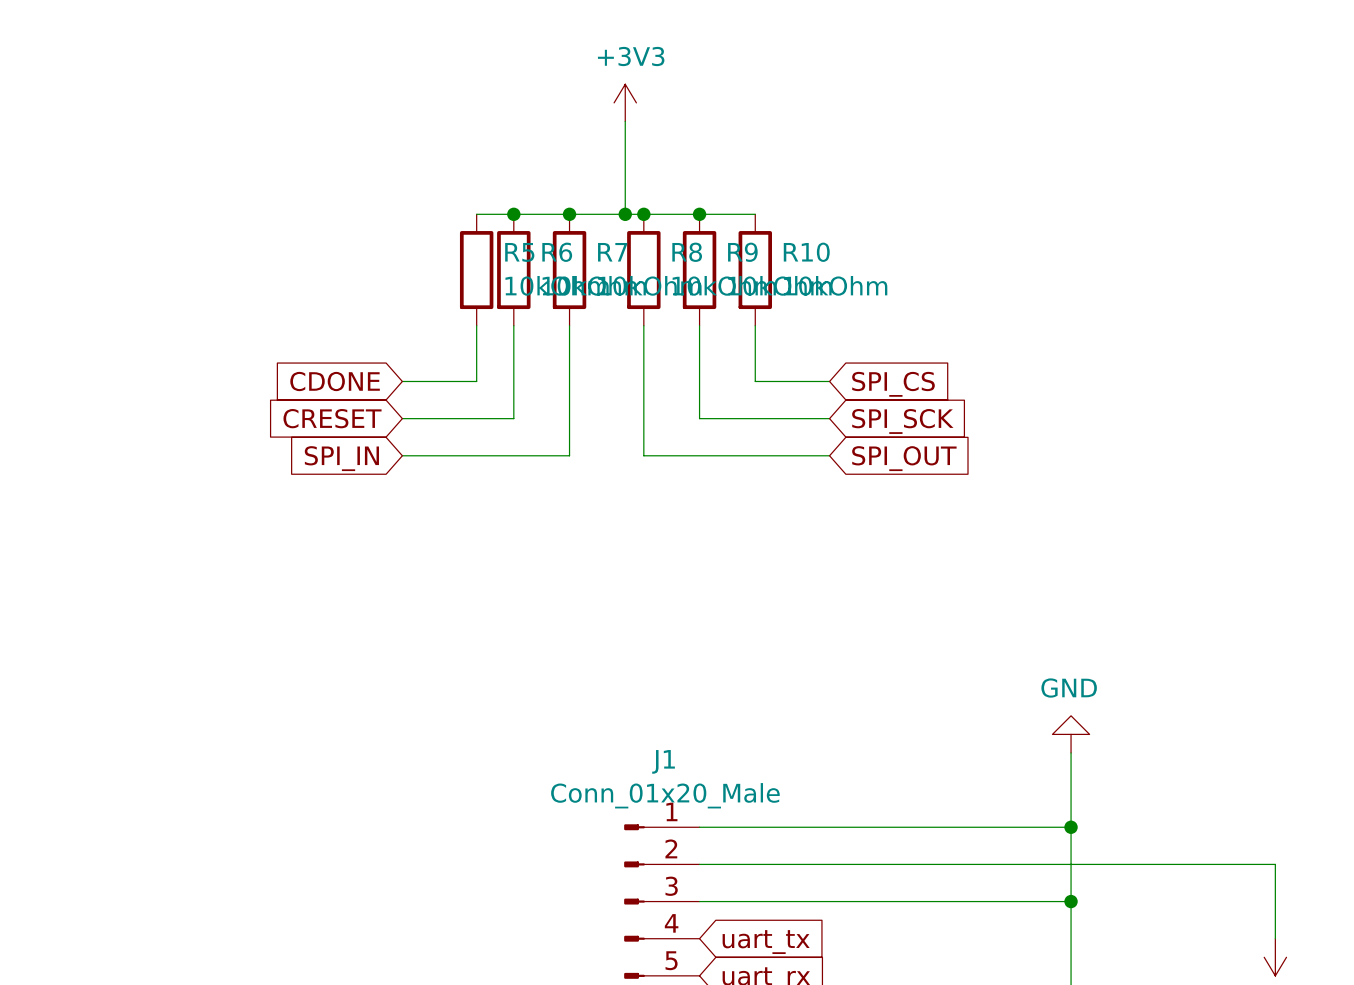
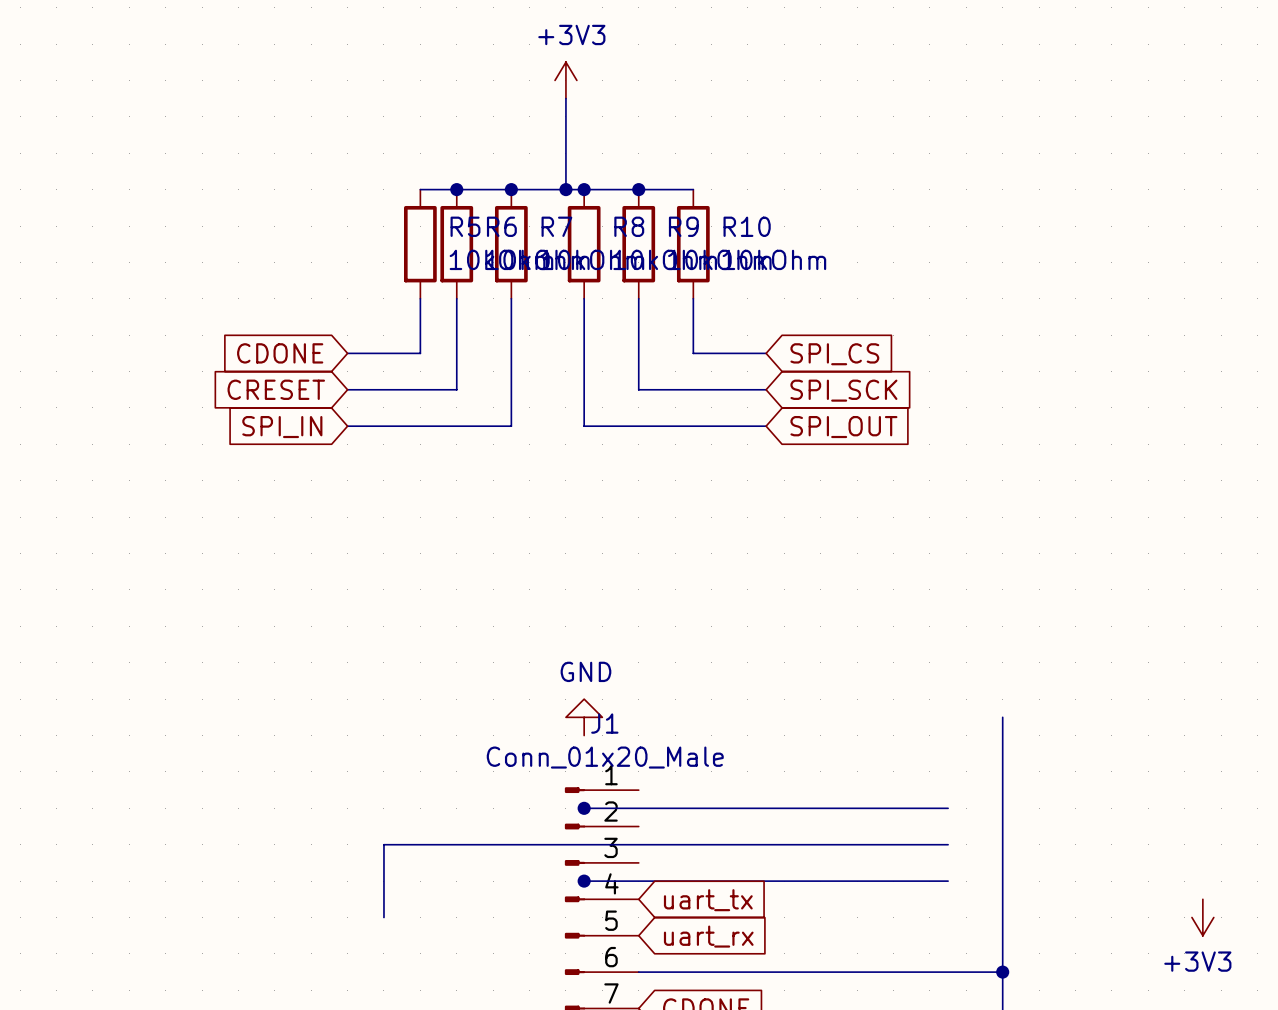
power symbol: GND (1071, 734) -> none
power symbol: none -> GND (584, 717)
wire: (699, 827) (1071, 827) -> (584, 808) (948, 808)
junction: (1071, 827) -> none
junction: none -> (584, 808)
wire: (699, 864) (1275, 864) (1275, 938) -> none
wire: none -> (948, 844) (383, 844) (383, 917)
wire: (699, 901) (1071, 901) -> (584, 881) (948, 881)
junction: (1071, 901) -> none
junction: none -> (584, 881)

